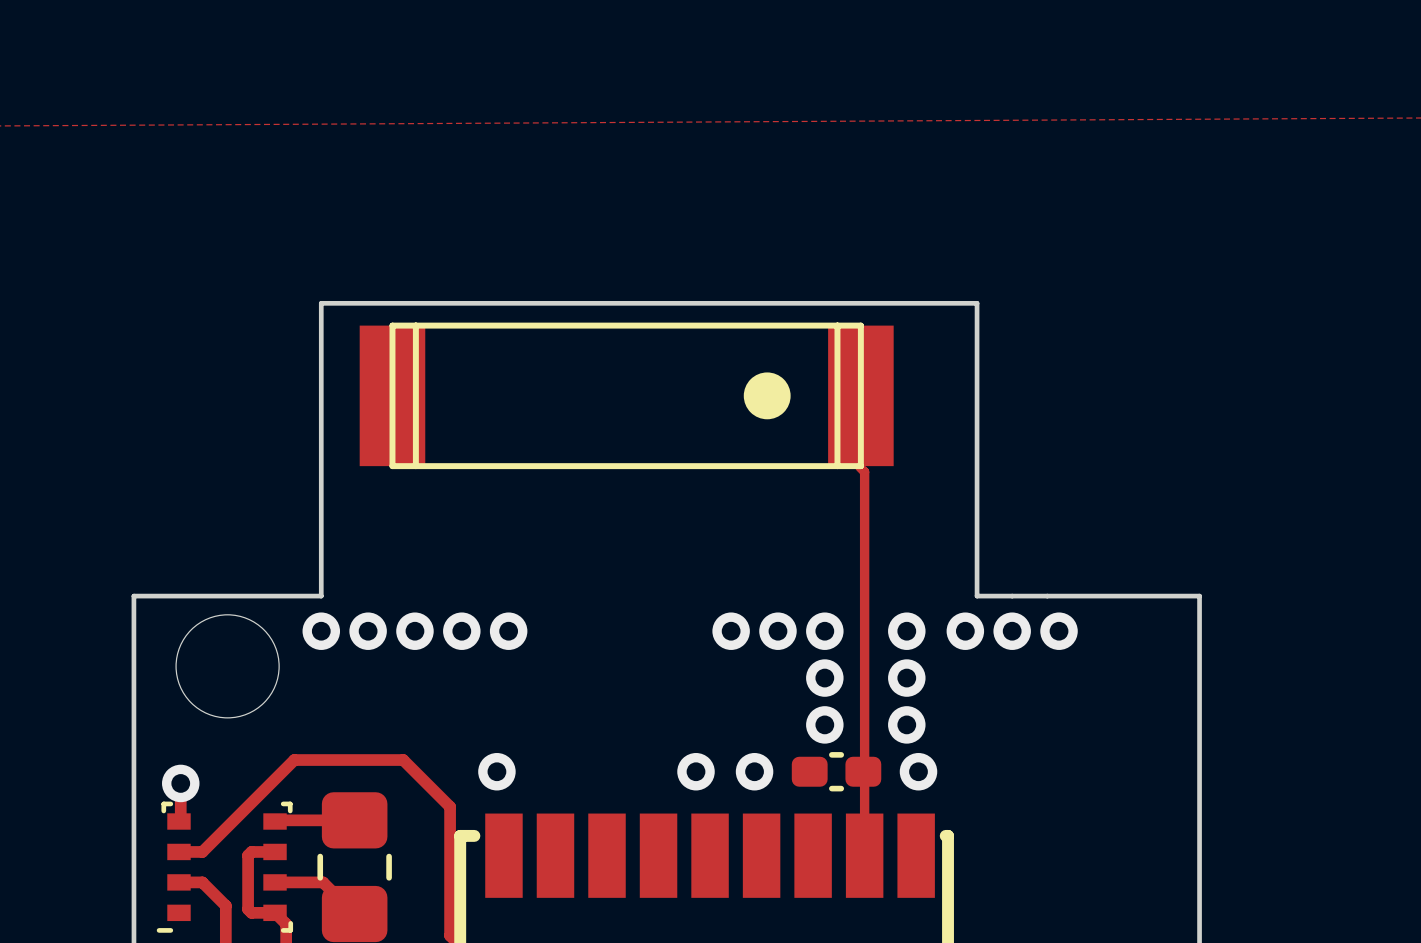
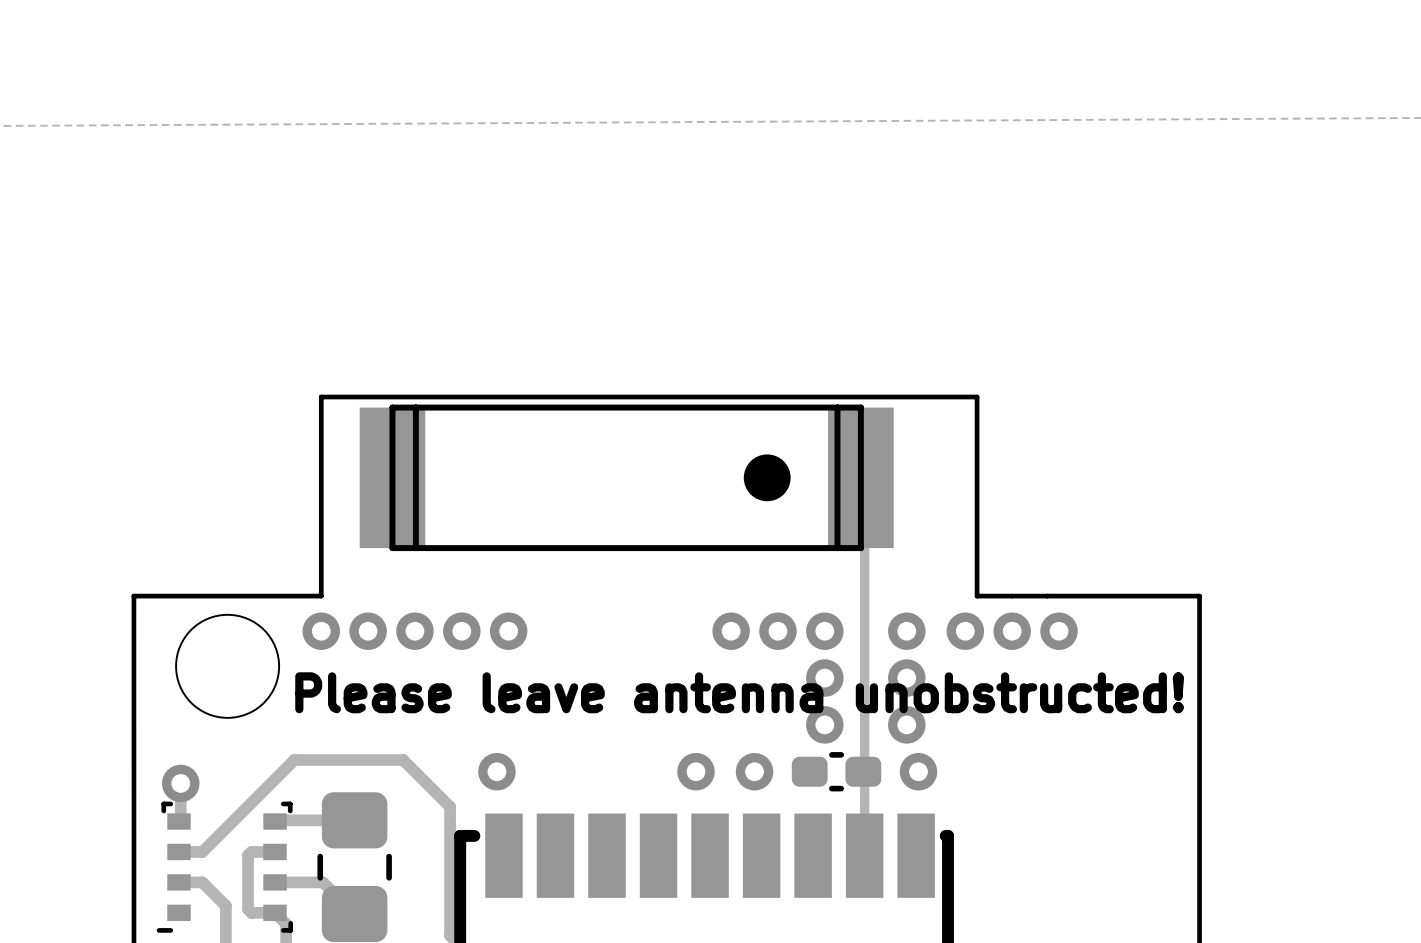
part position: (626, 395) -> (626, 477)
board edge: (321, 397) (321, 303) (977, 303) (977, 397) -> (321, 397) (977, 397)
text: none -> Please leave antenna unobstructed! (739, 692)

